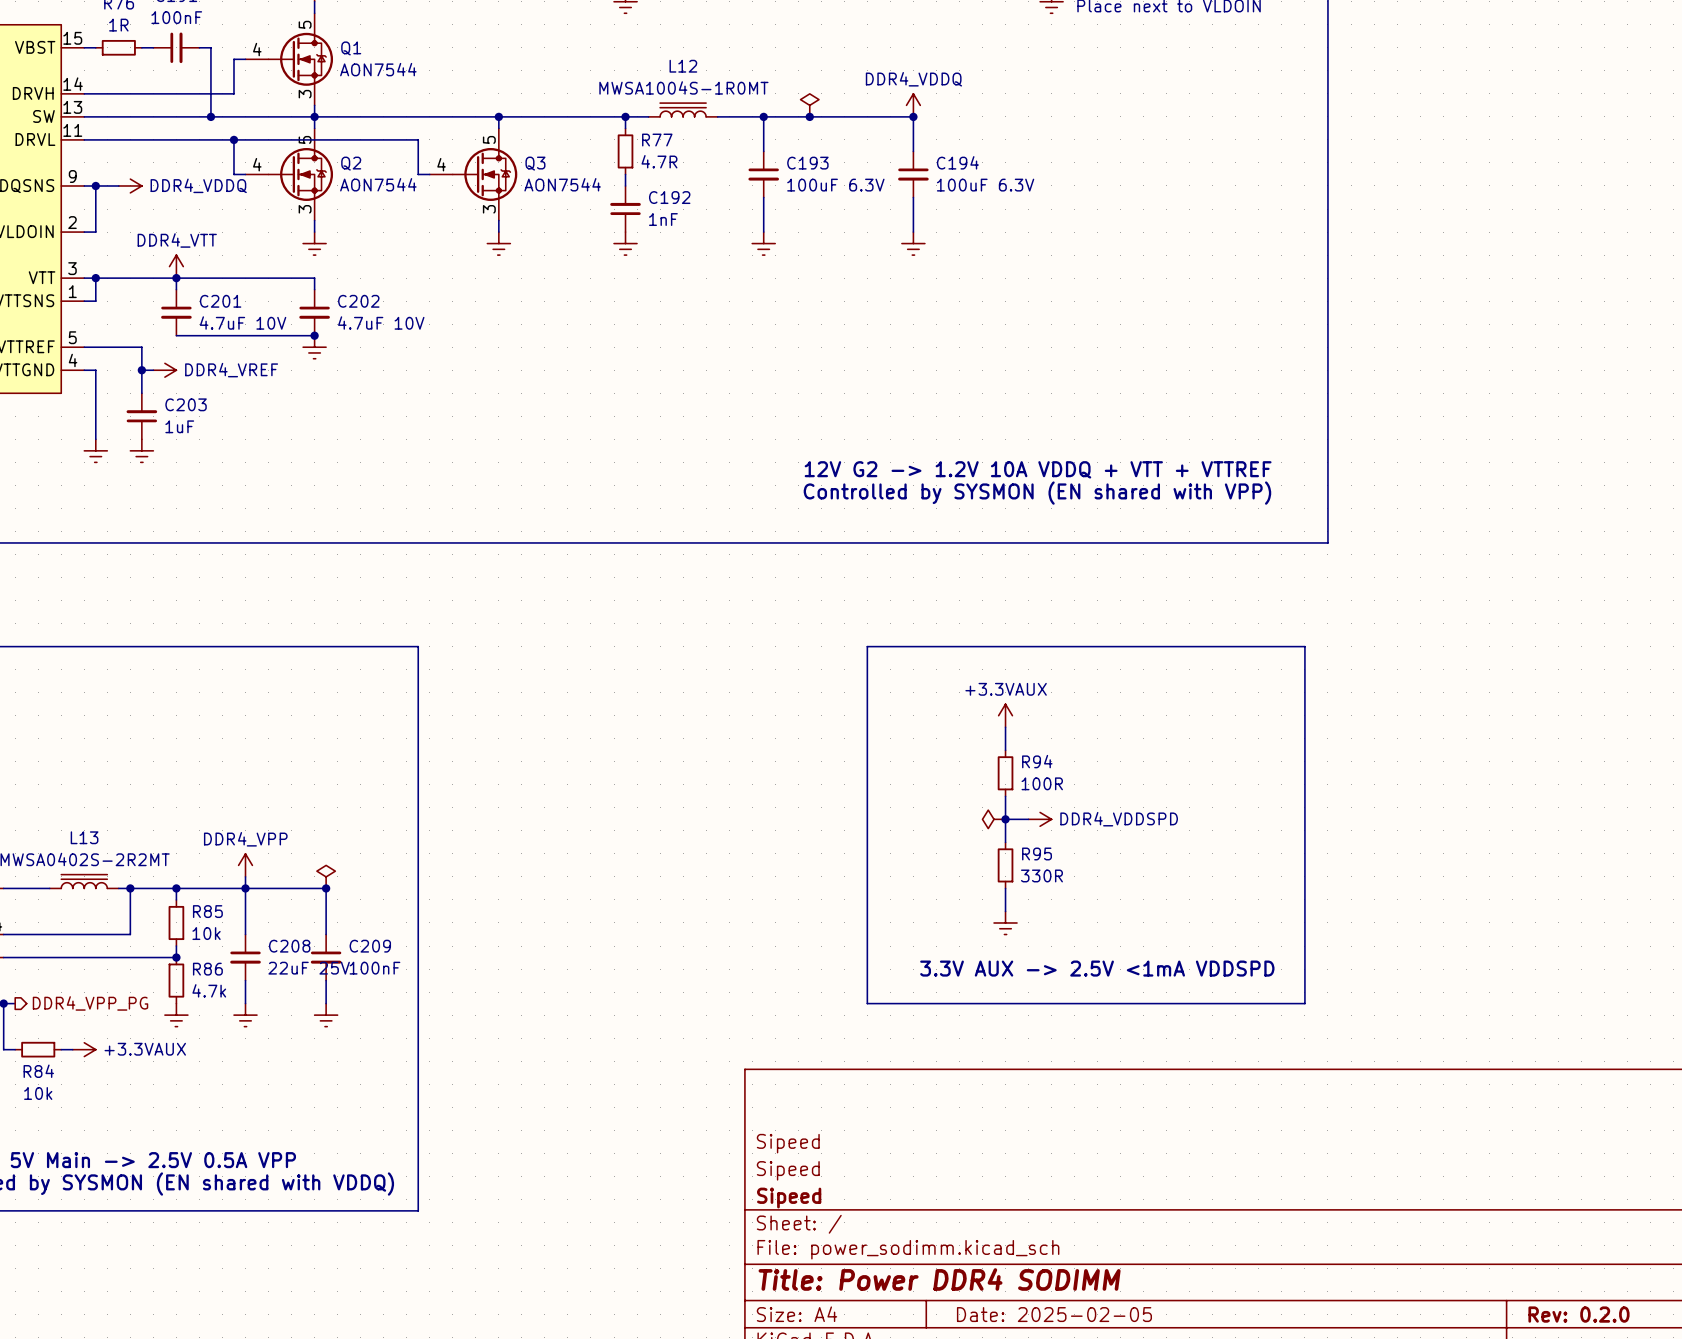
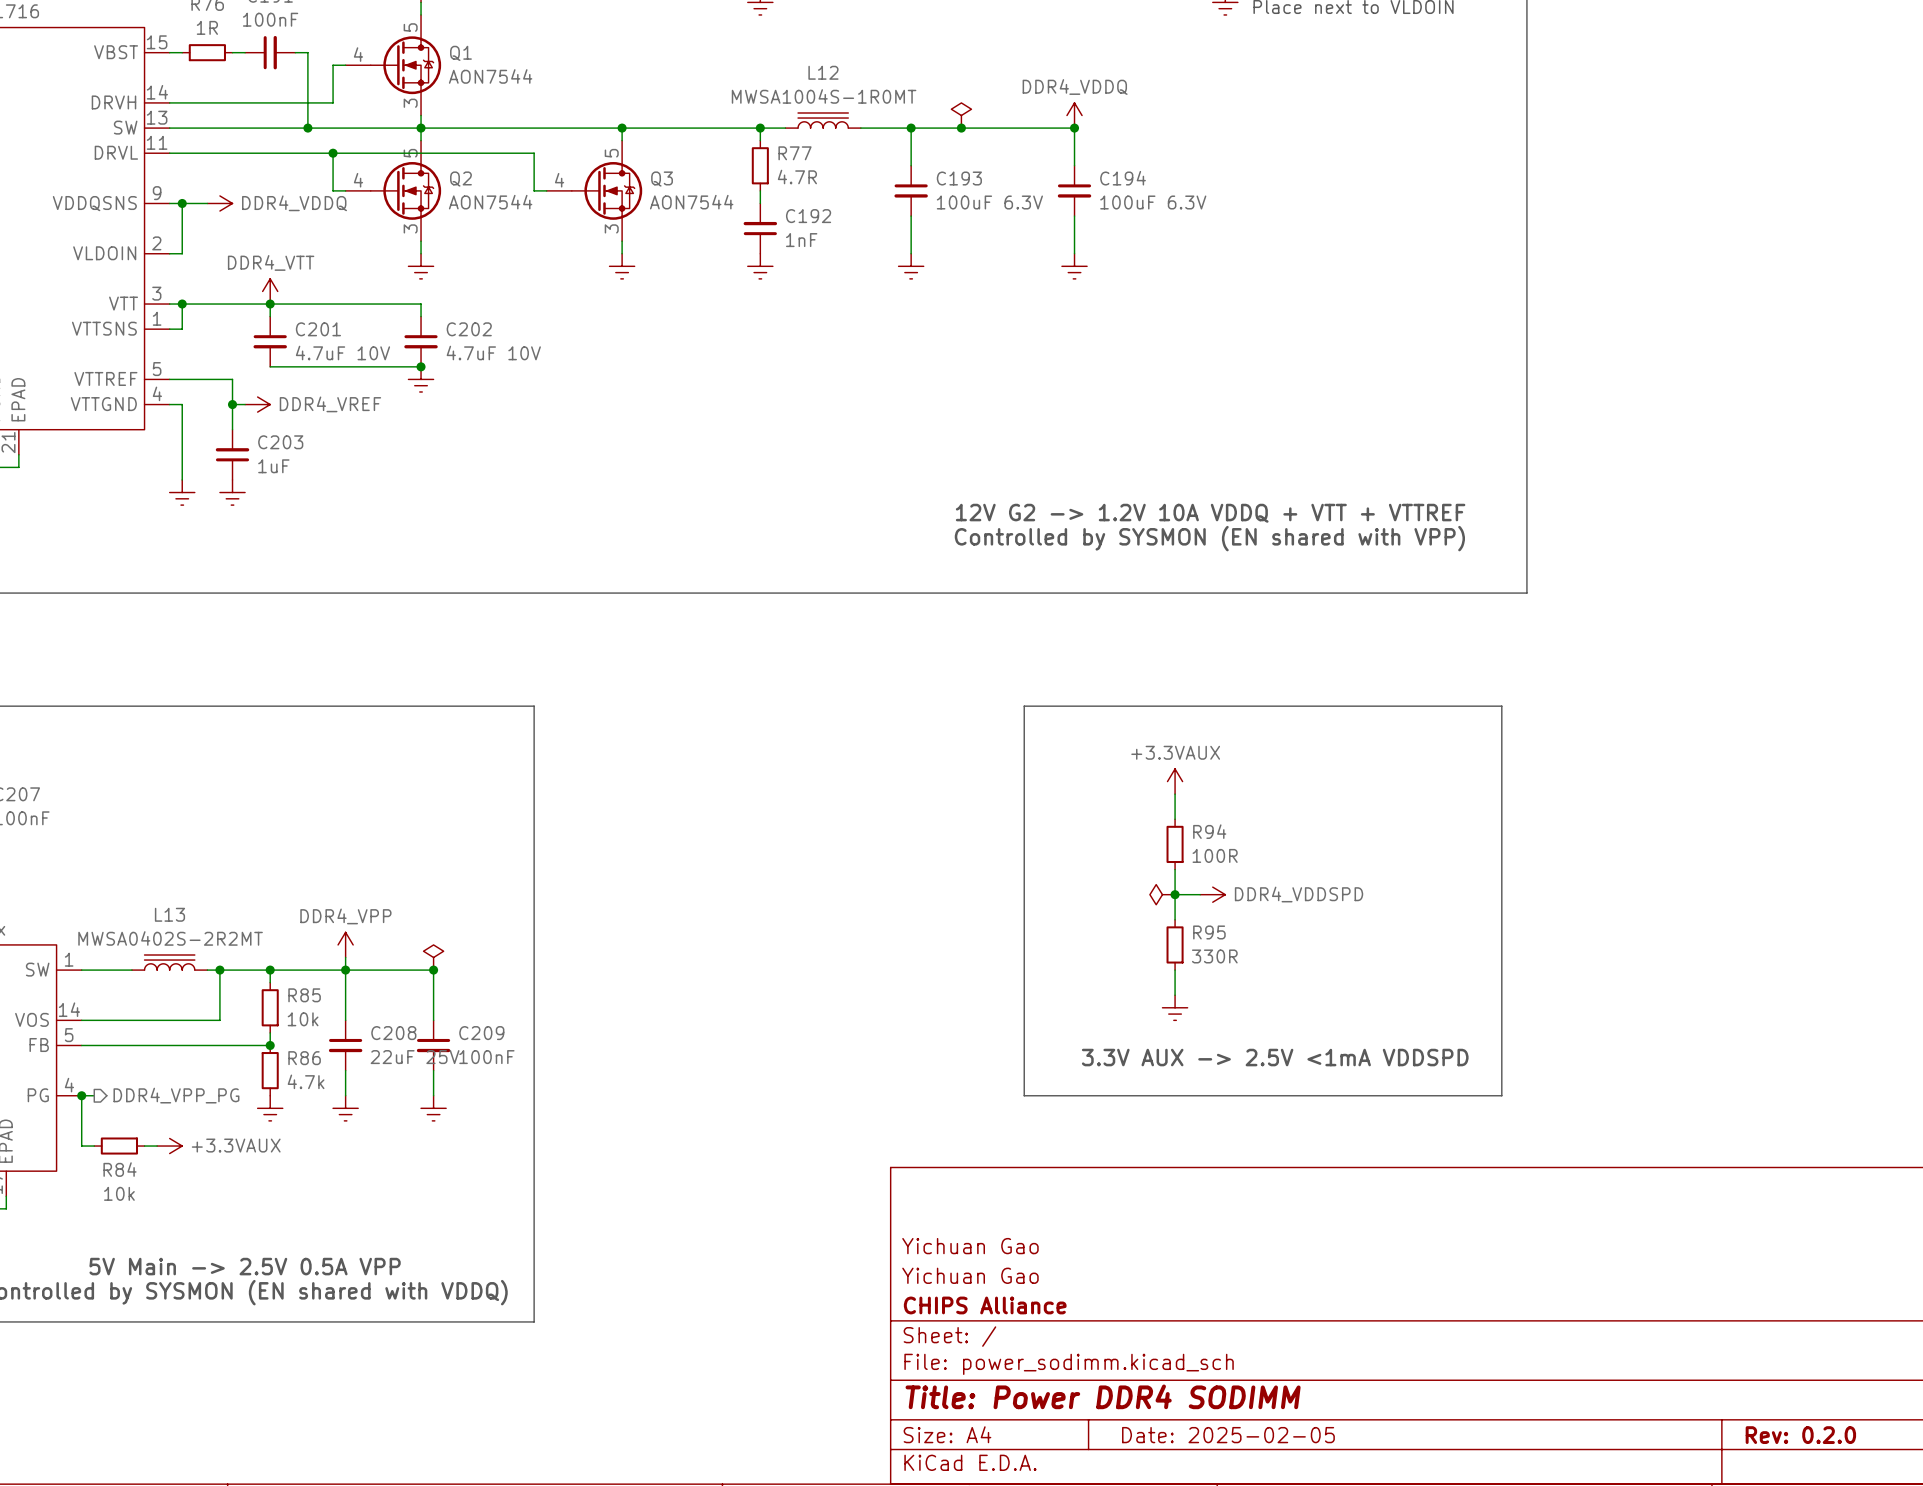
title block: Sipeed (788, 1143) -> Yichuan Gao (970, 1246)
title block: Sipeed (788, 1170) -> Yichuan Gao (970, 1275)
title block: Sipeed (789, 1198) -> CHIPS Alliance (985, 1305)

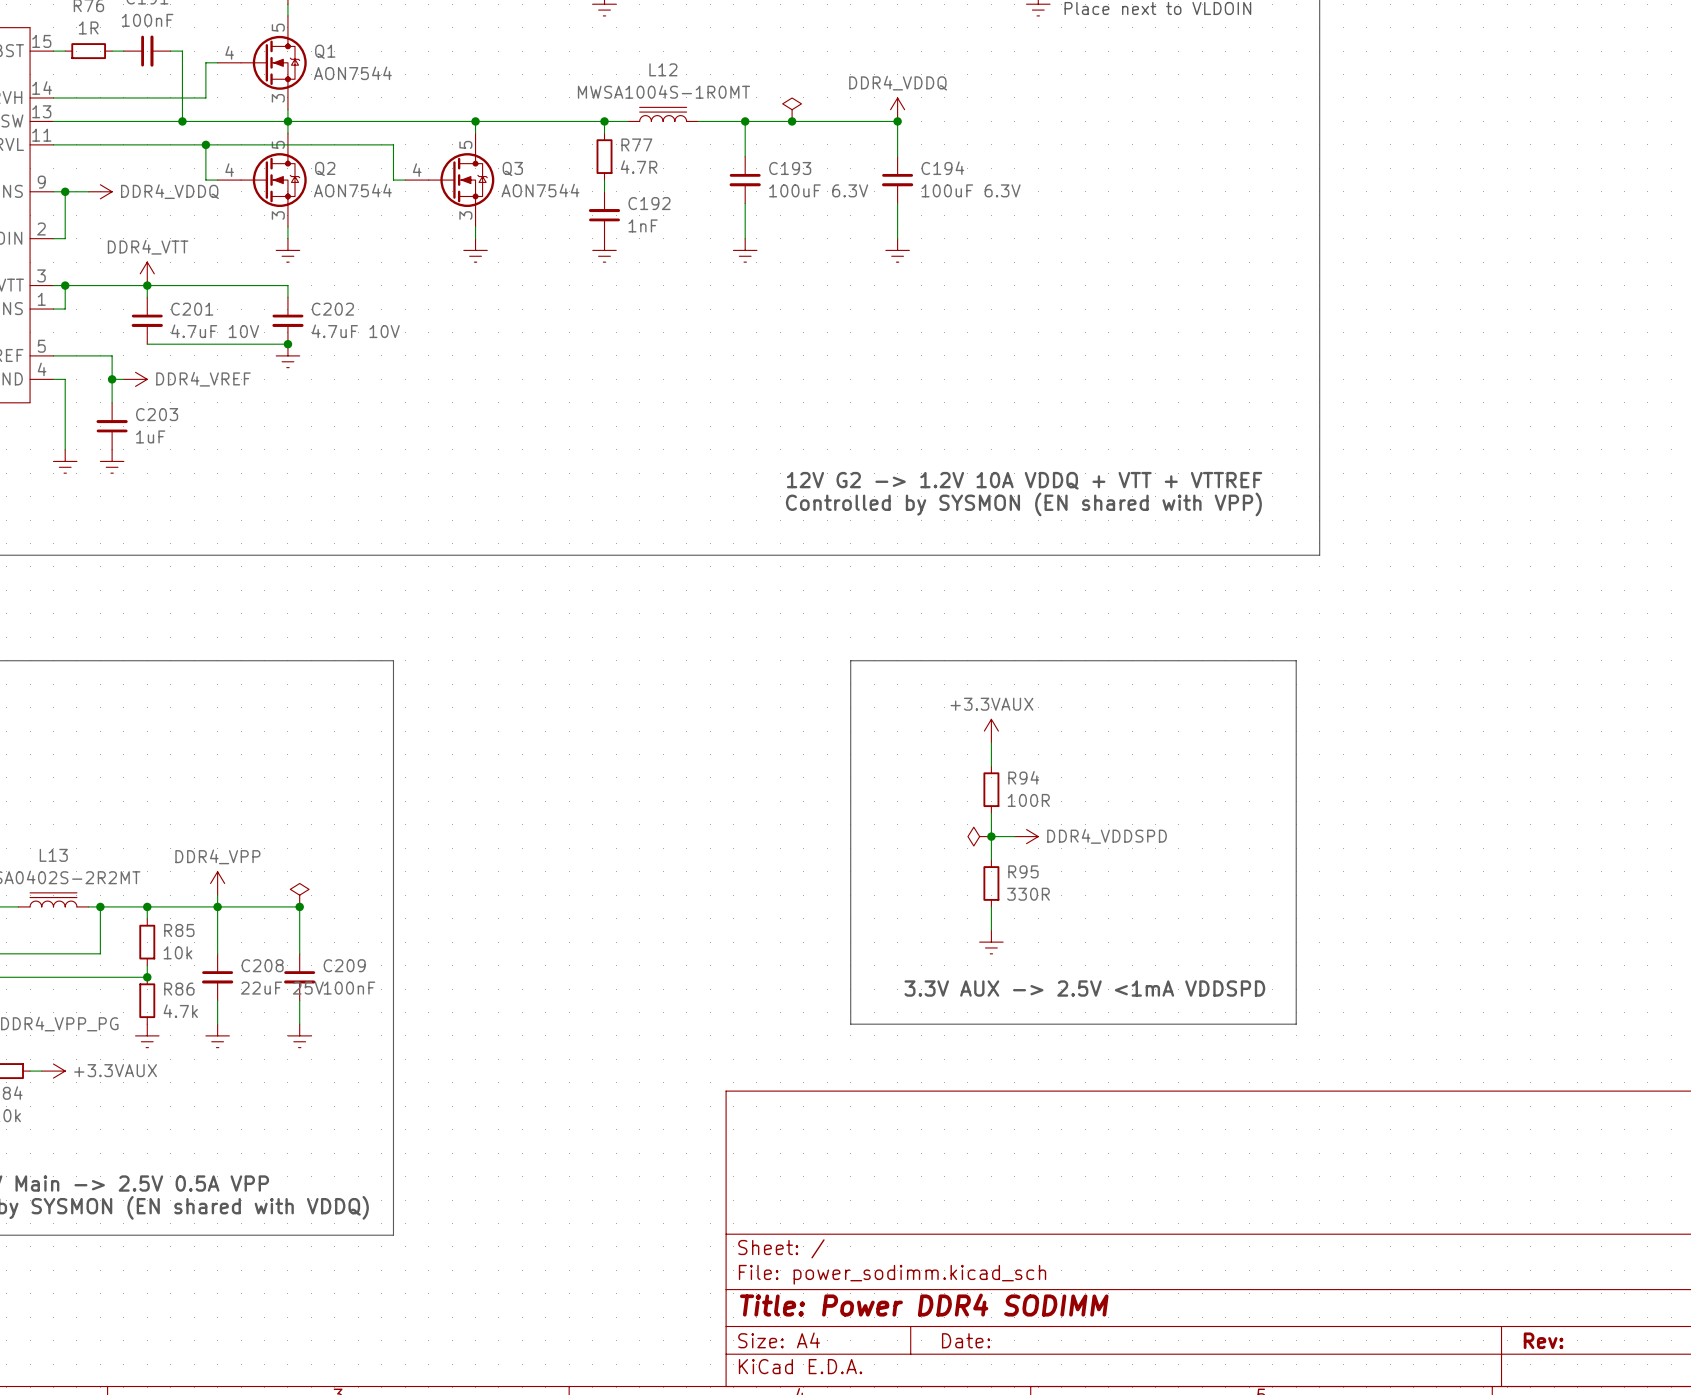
title block: Yichuan Gao (970, 1246) -> none
title block: Yichuan Gao (970, 1275) -> none
title block: CHIPS Alliance (985, 1305) -> none
title block: Date: 2025-02-05 (1228, 1435) -> Date: (966, 1340)
title block: Rev: 0.2.0 (1800, 1435) -> Rev: (1543, 1340)

